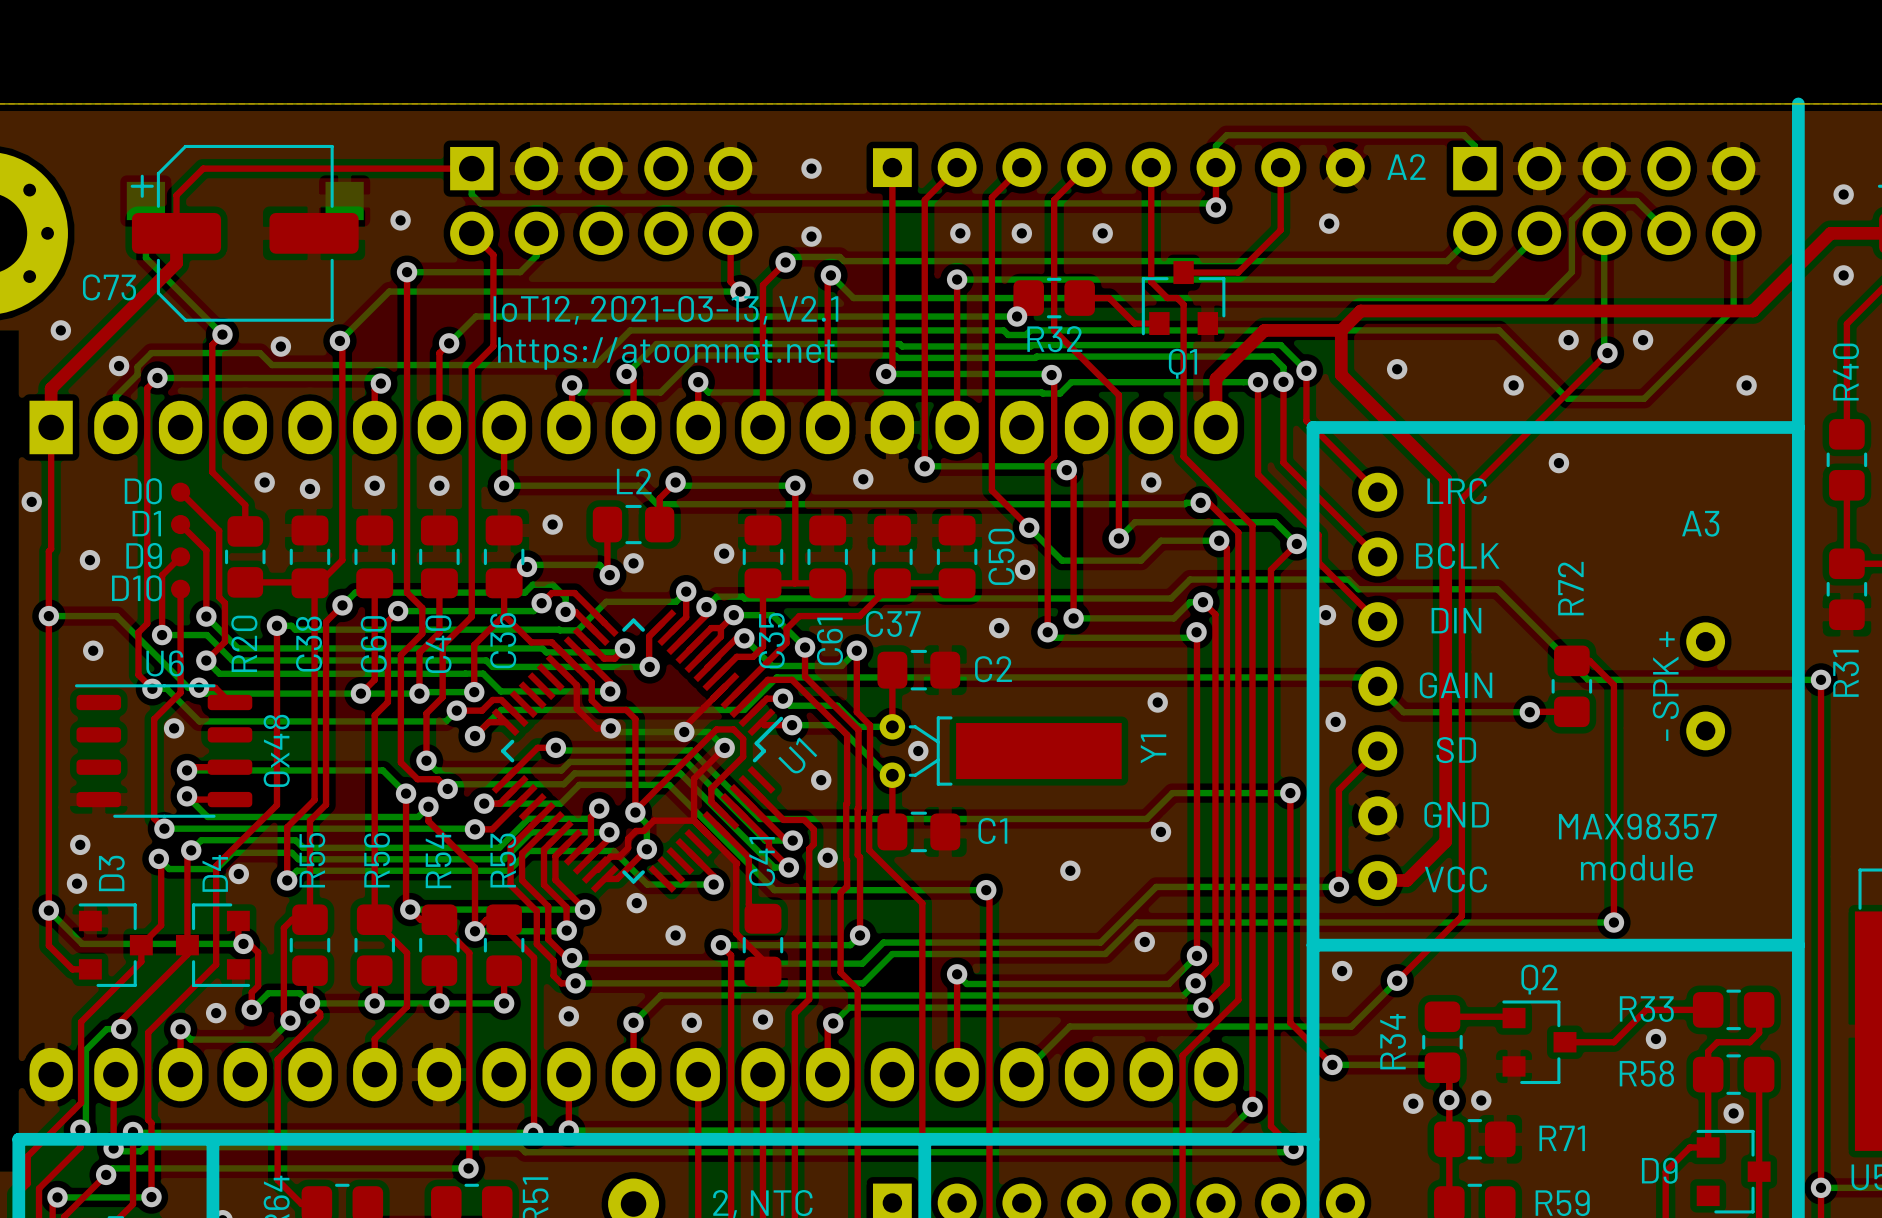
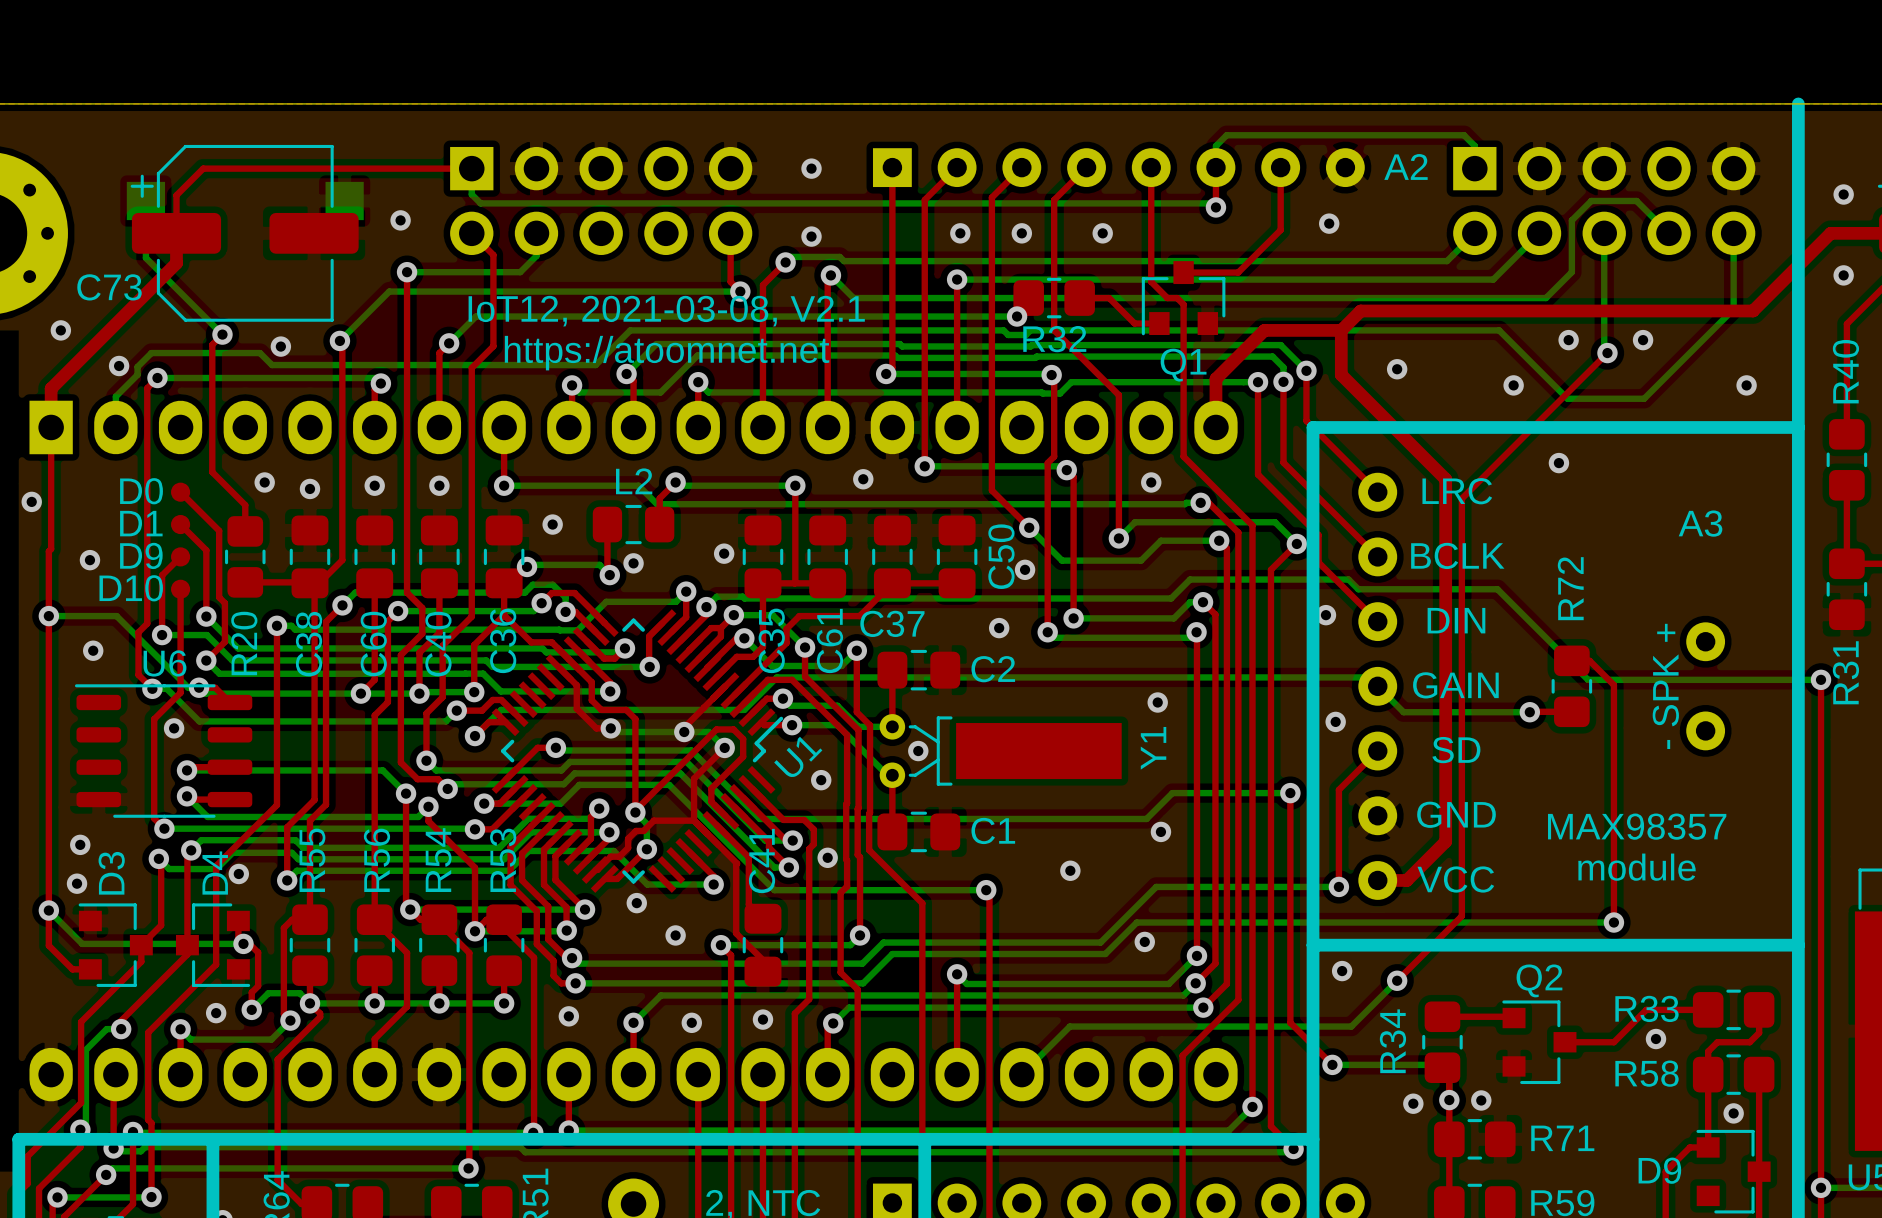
text: IoT12, 2021-03-13, V2.1 (665, 310) -> IoT12, 2021-03-08, V2.1 (666, 311)
text: 0x48 (276, 750) -> none

